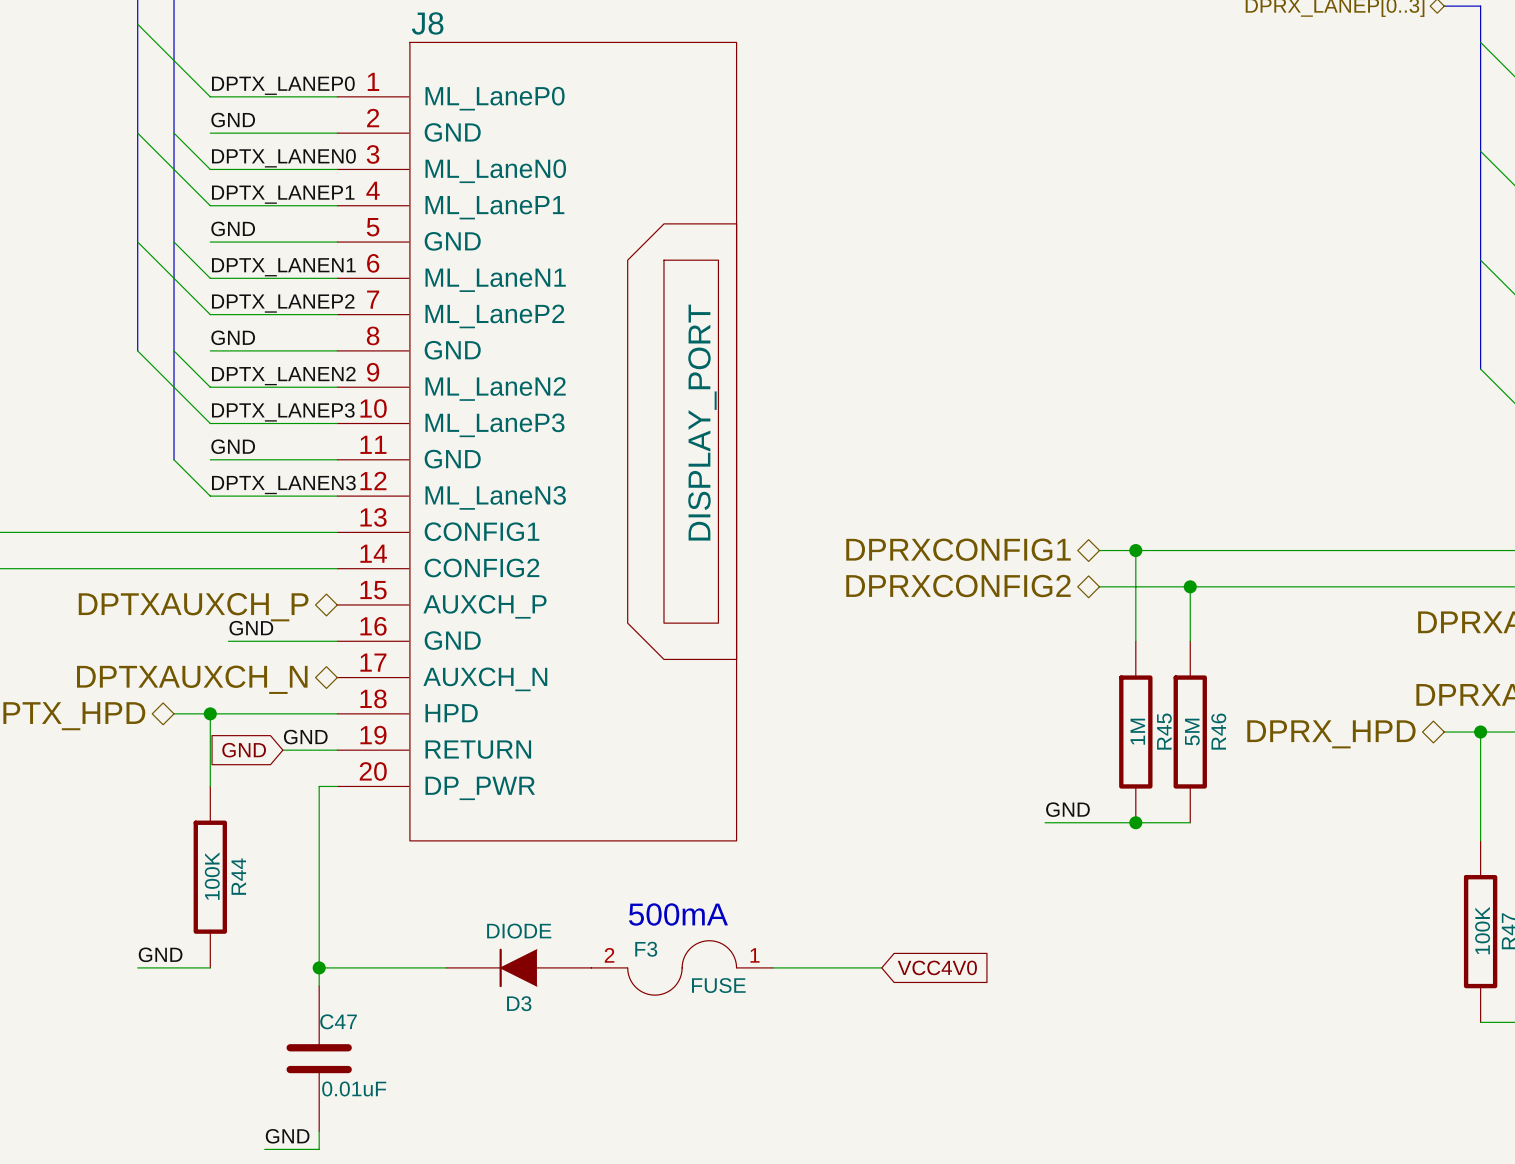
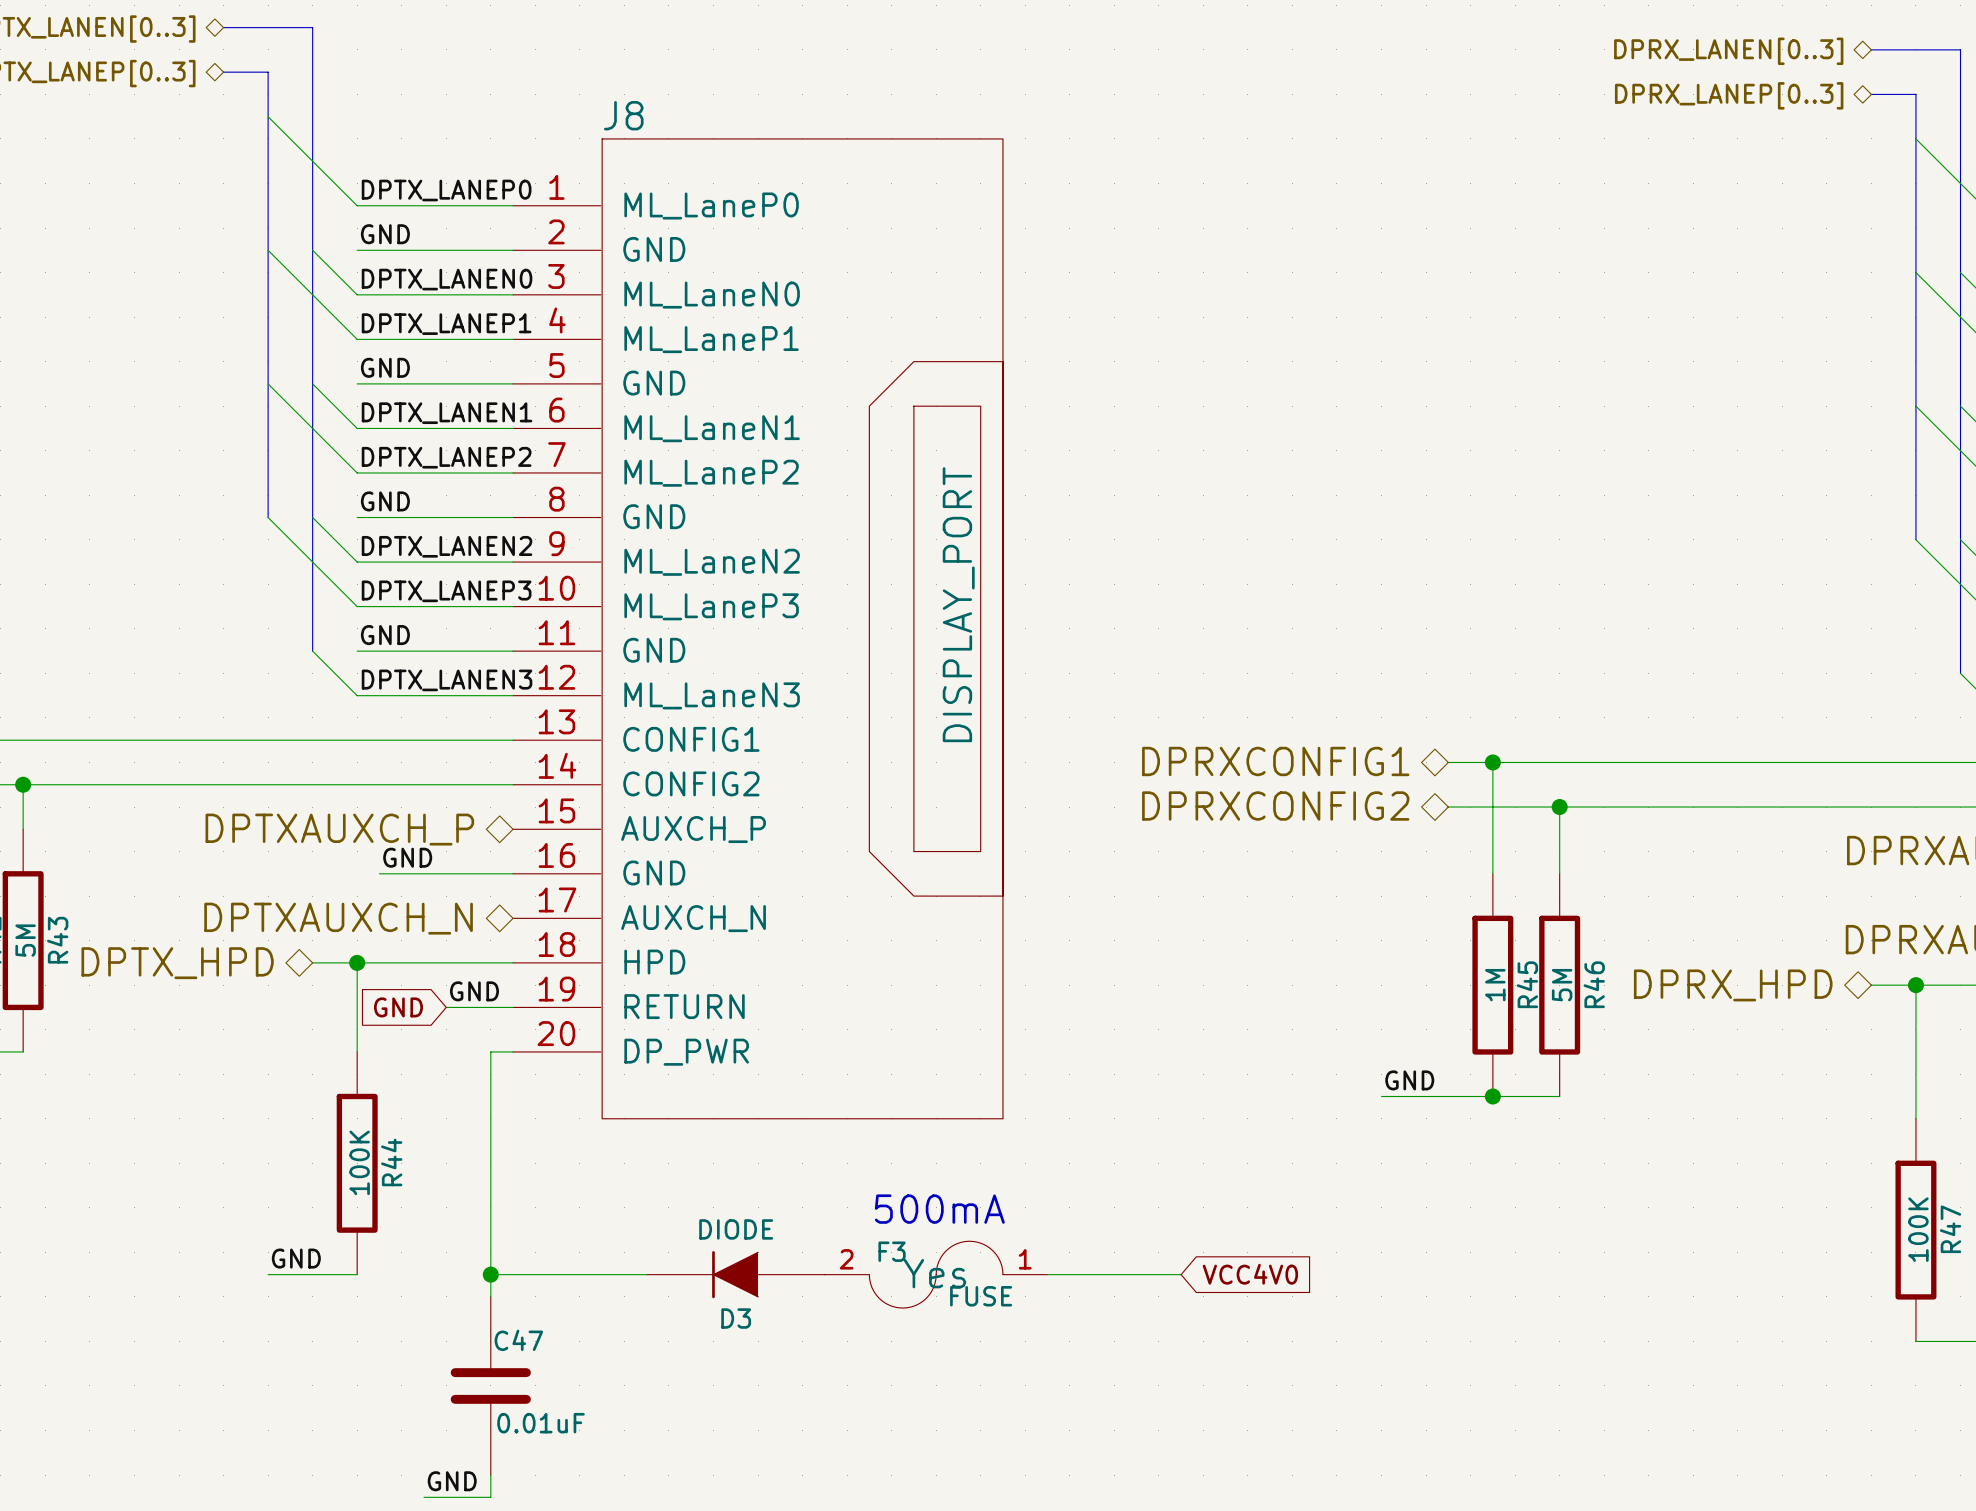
F3 text: none -> Yes (934, 1273)

